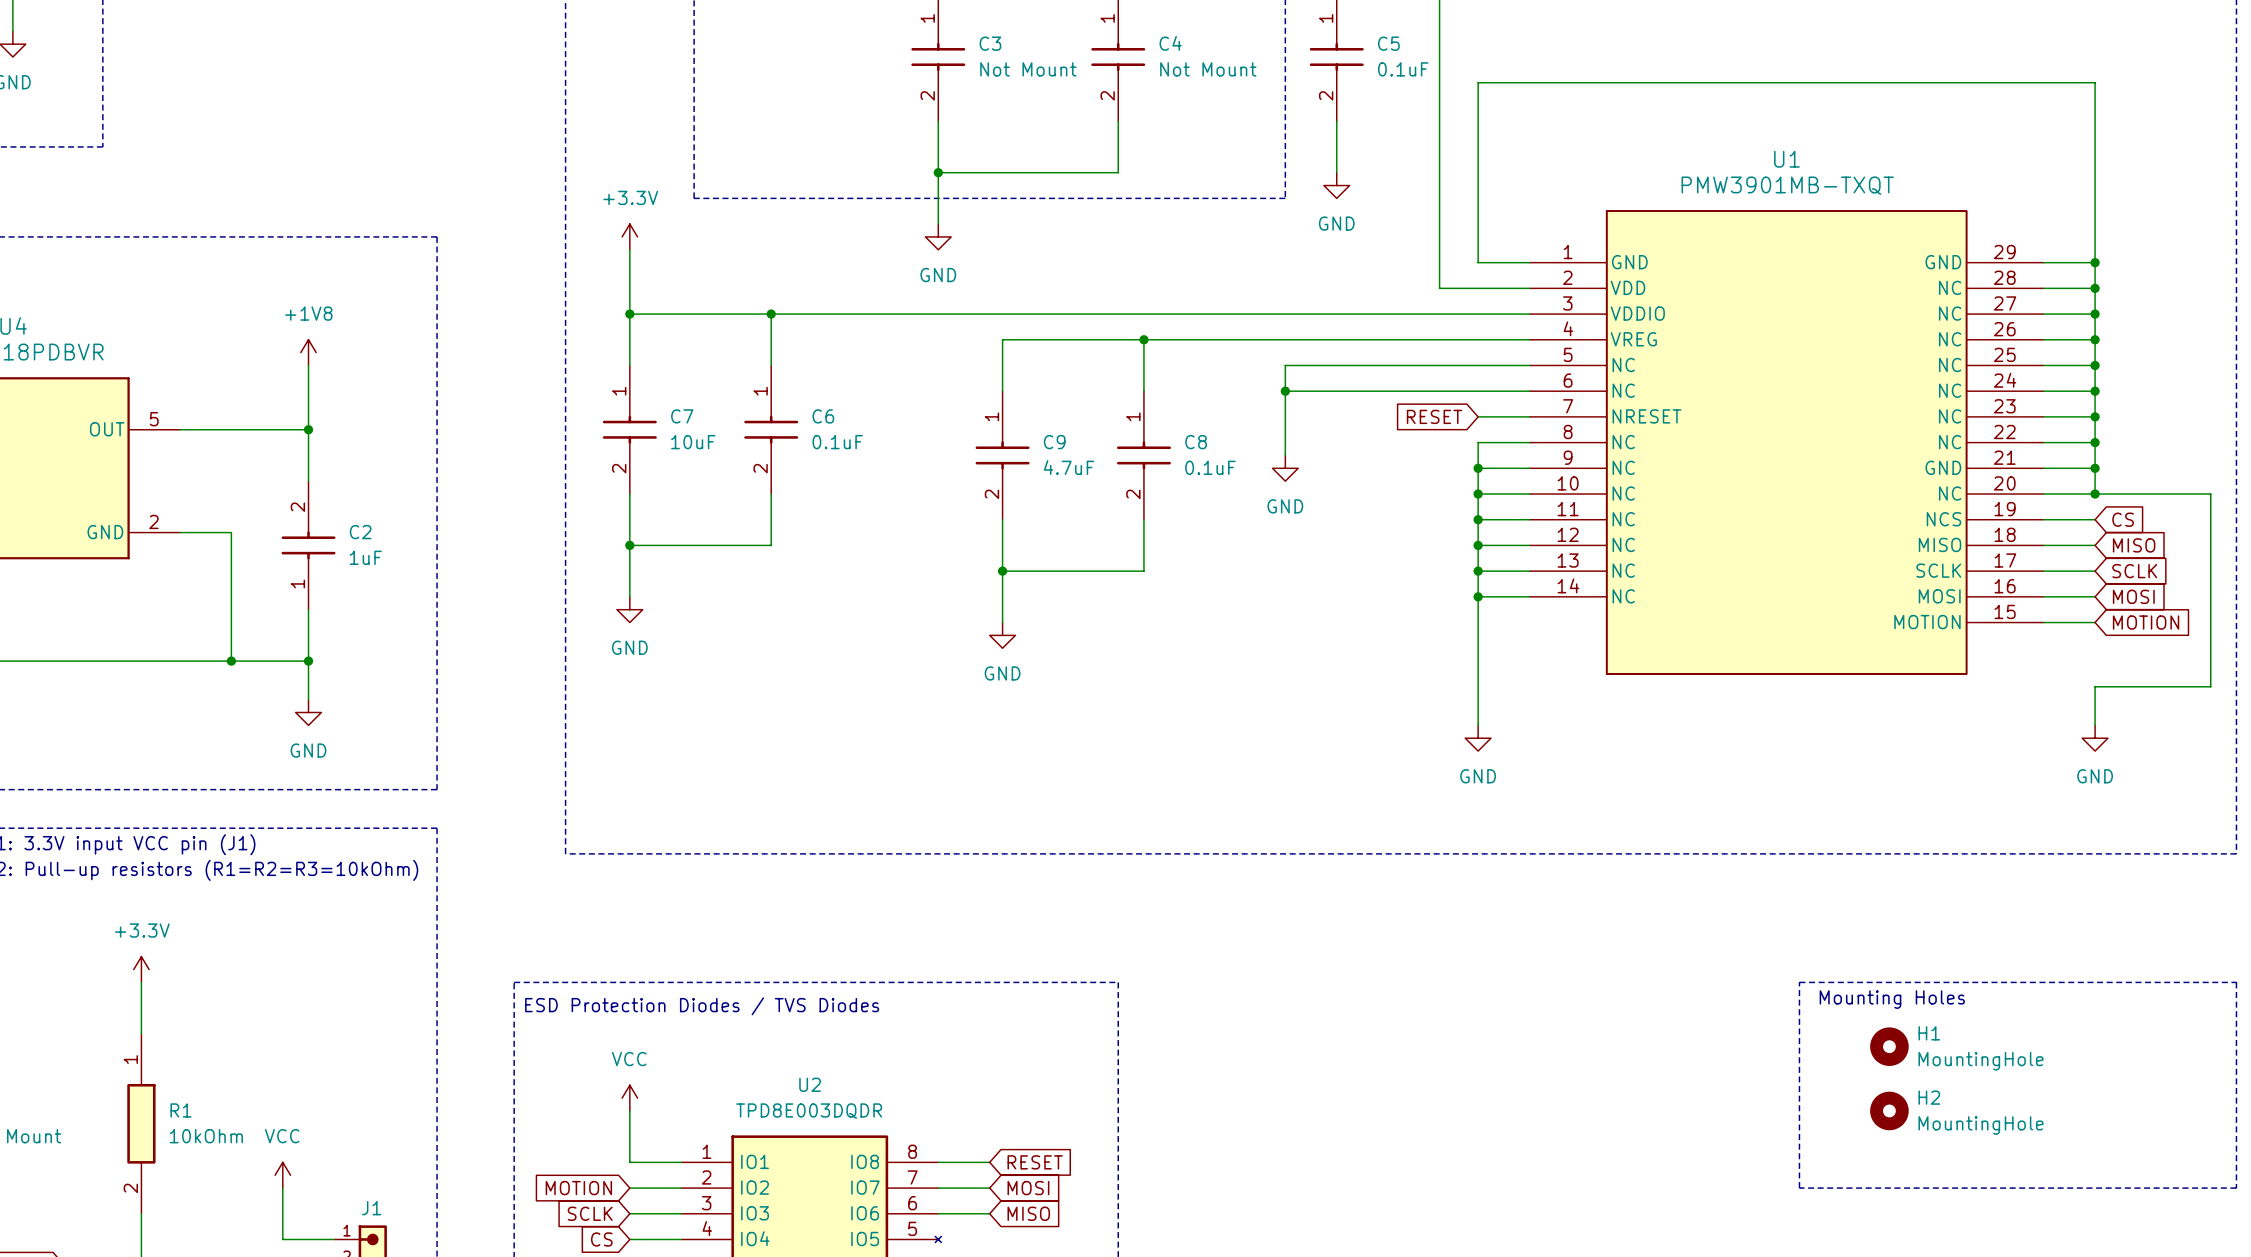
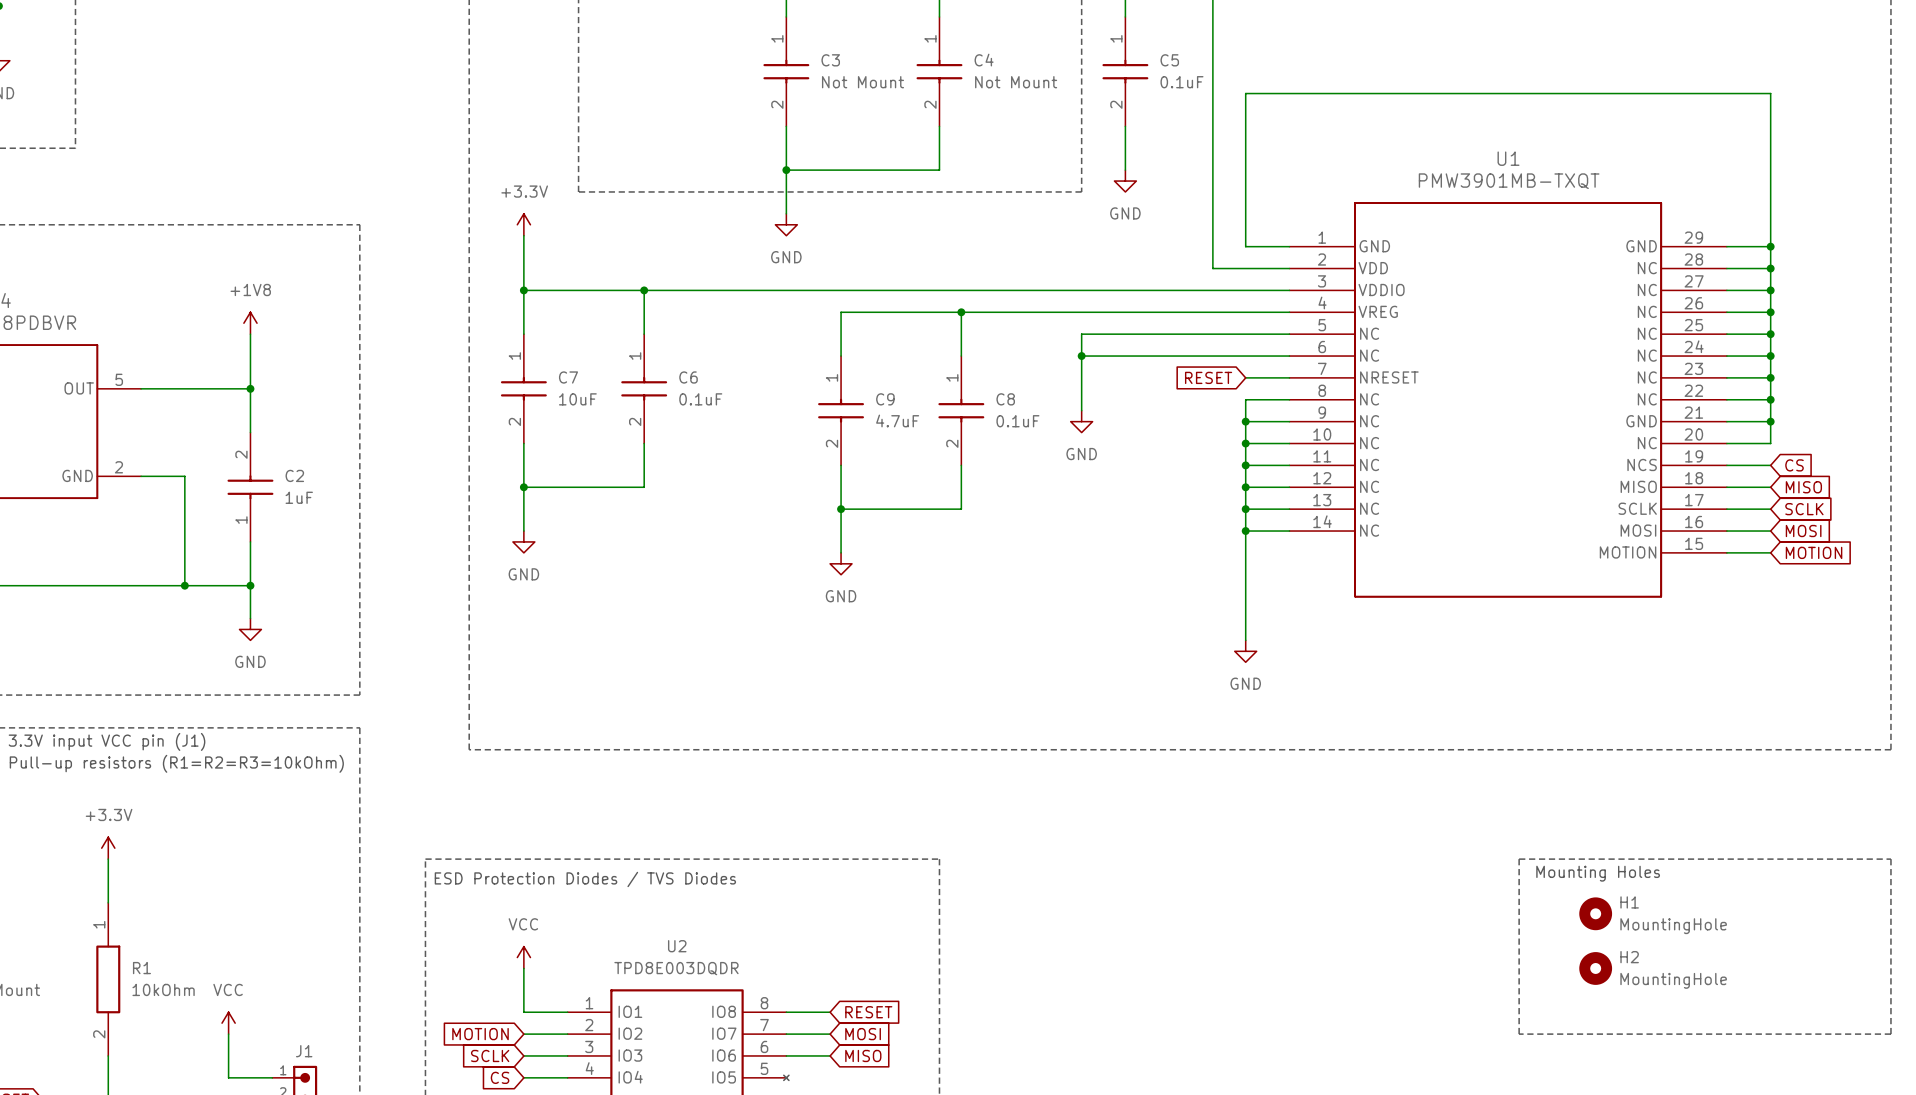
wire: (2095, 494) (2210, 494) (2210, 686) (2095, 686) (2095, 725) -> none
junction: (2095, 494) -> none
power symbol: GND (2095, 738) -> none

